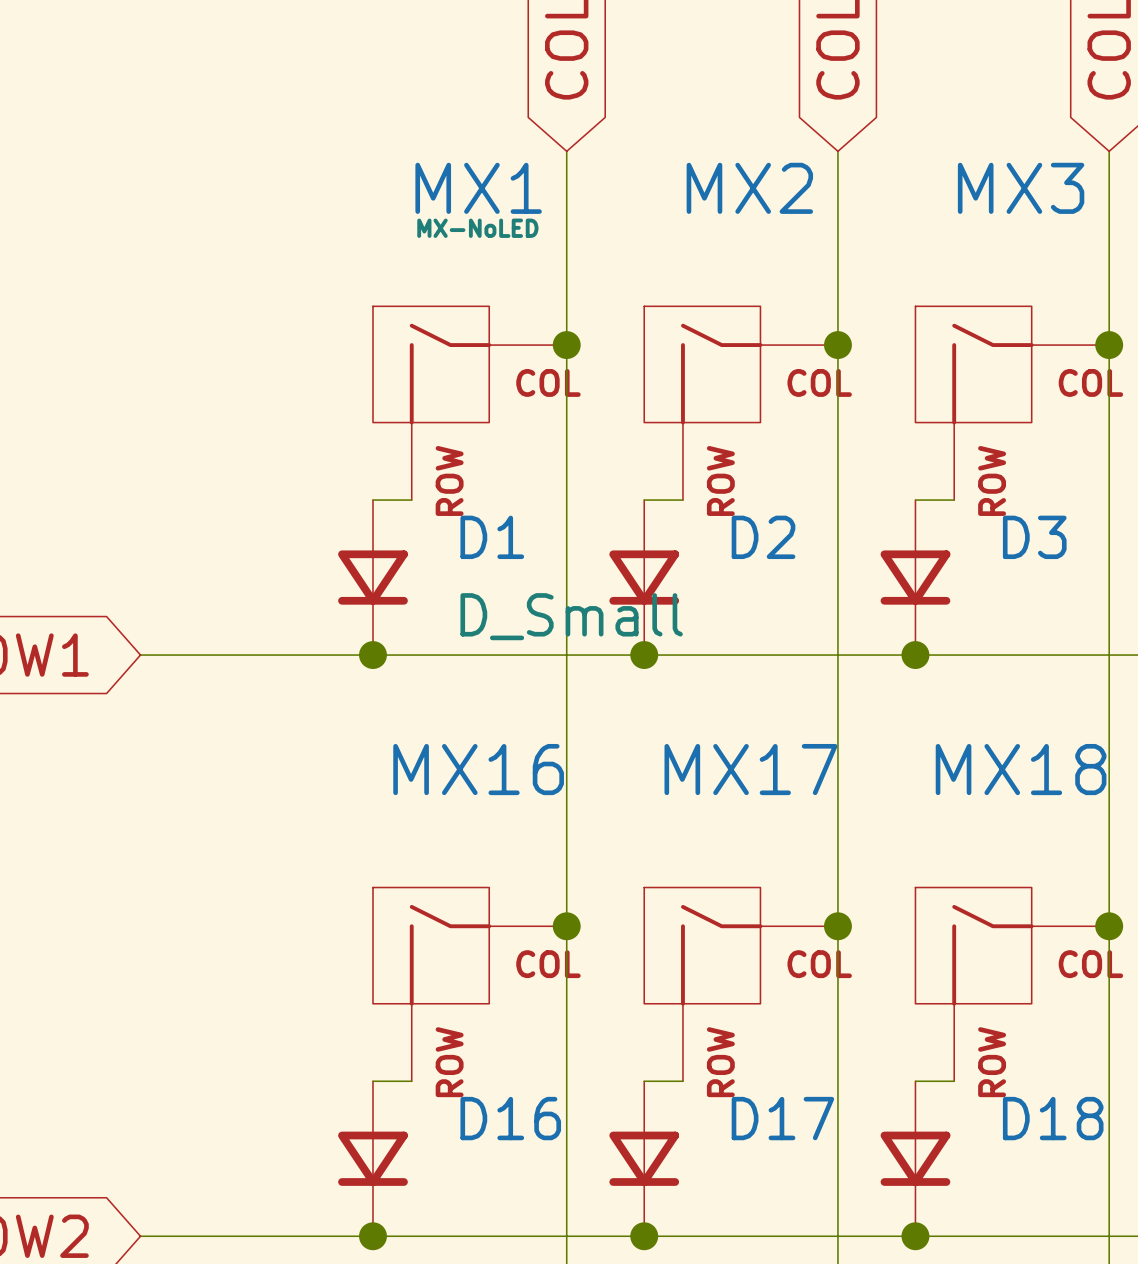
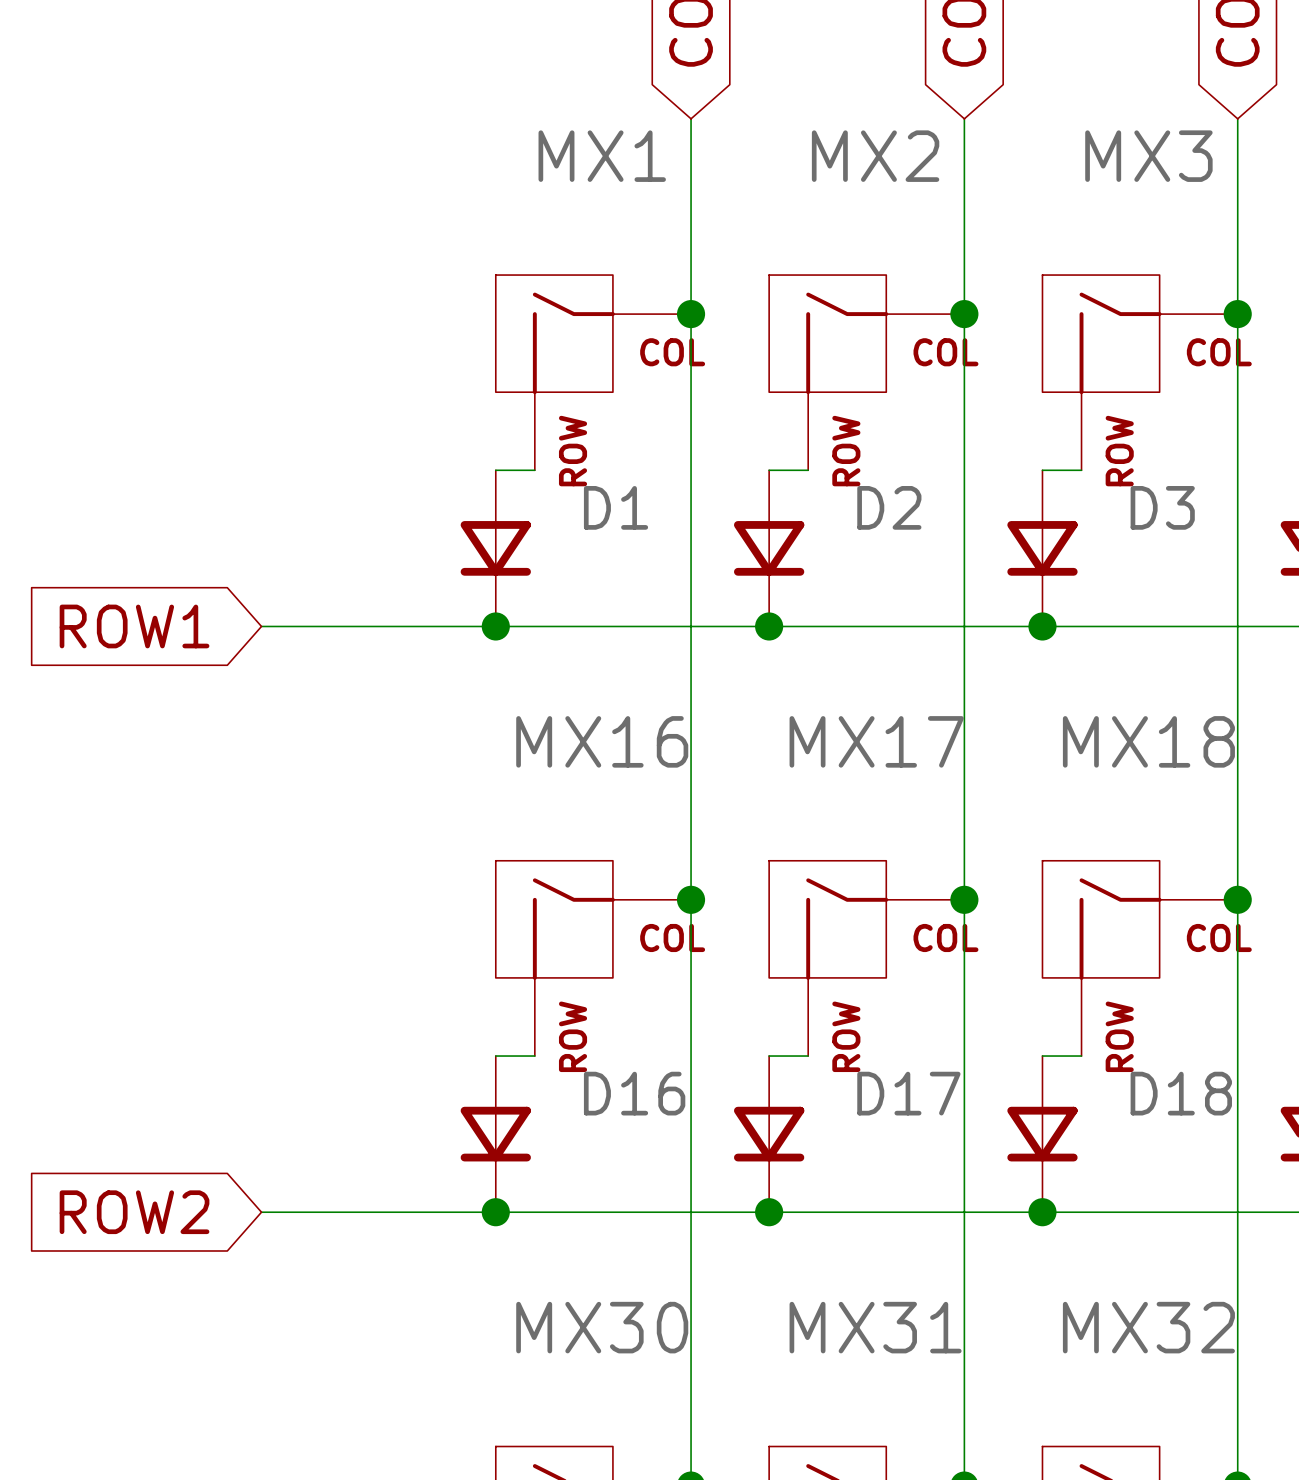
MX1 value: MX-NoLED (477, 228) -> none
D1 value: D_Small (571, 616) -> none

